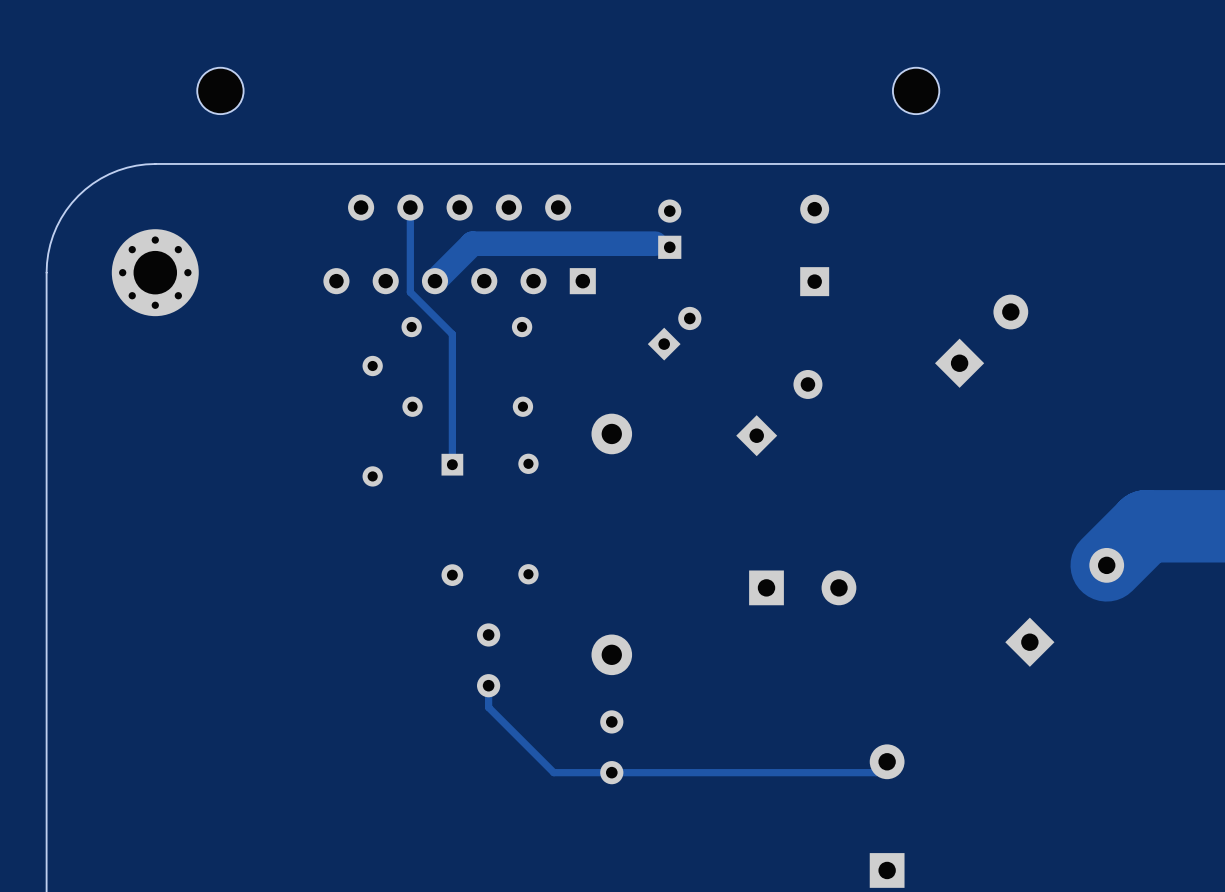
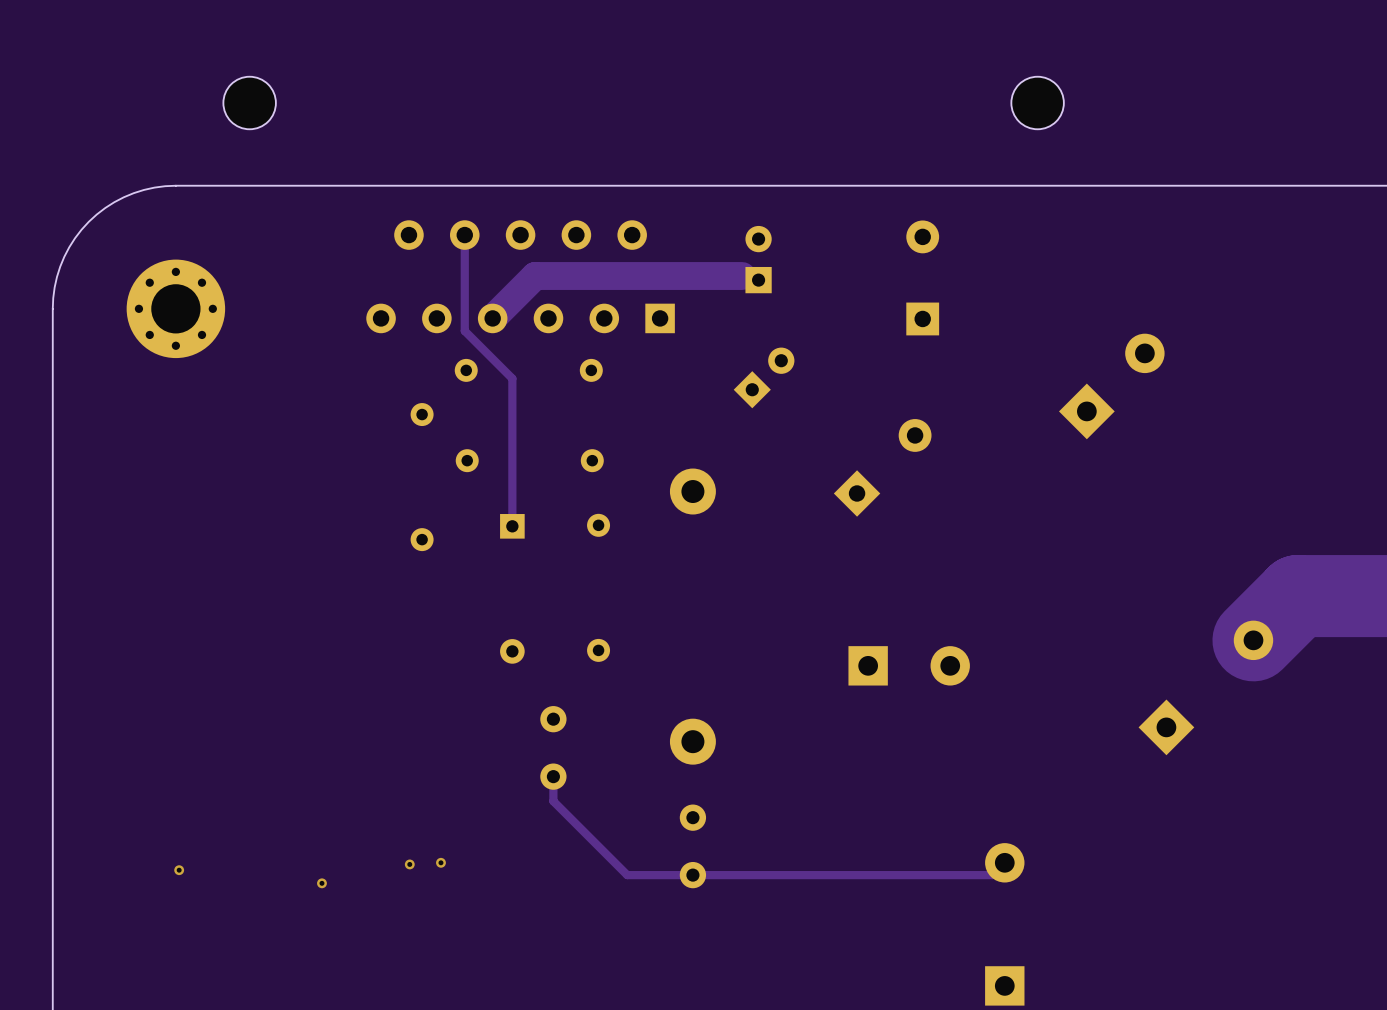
via: none -> (440, 862)
via: none -> (409, 864)
via: none -> (179, 870)
via: none -> (321, 883)

